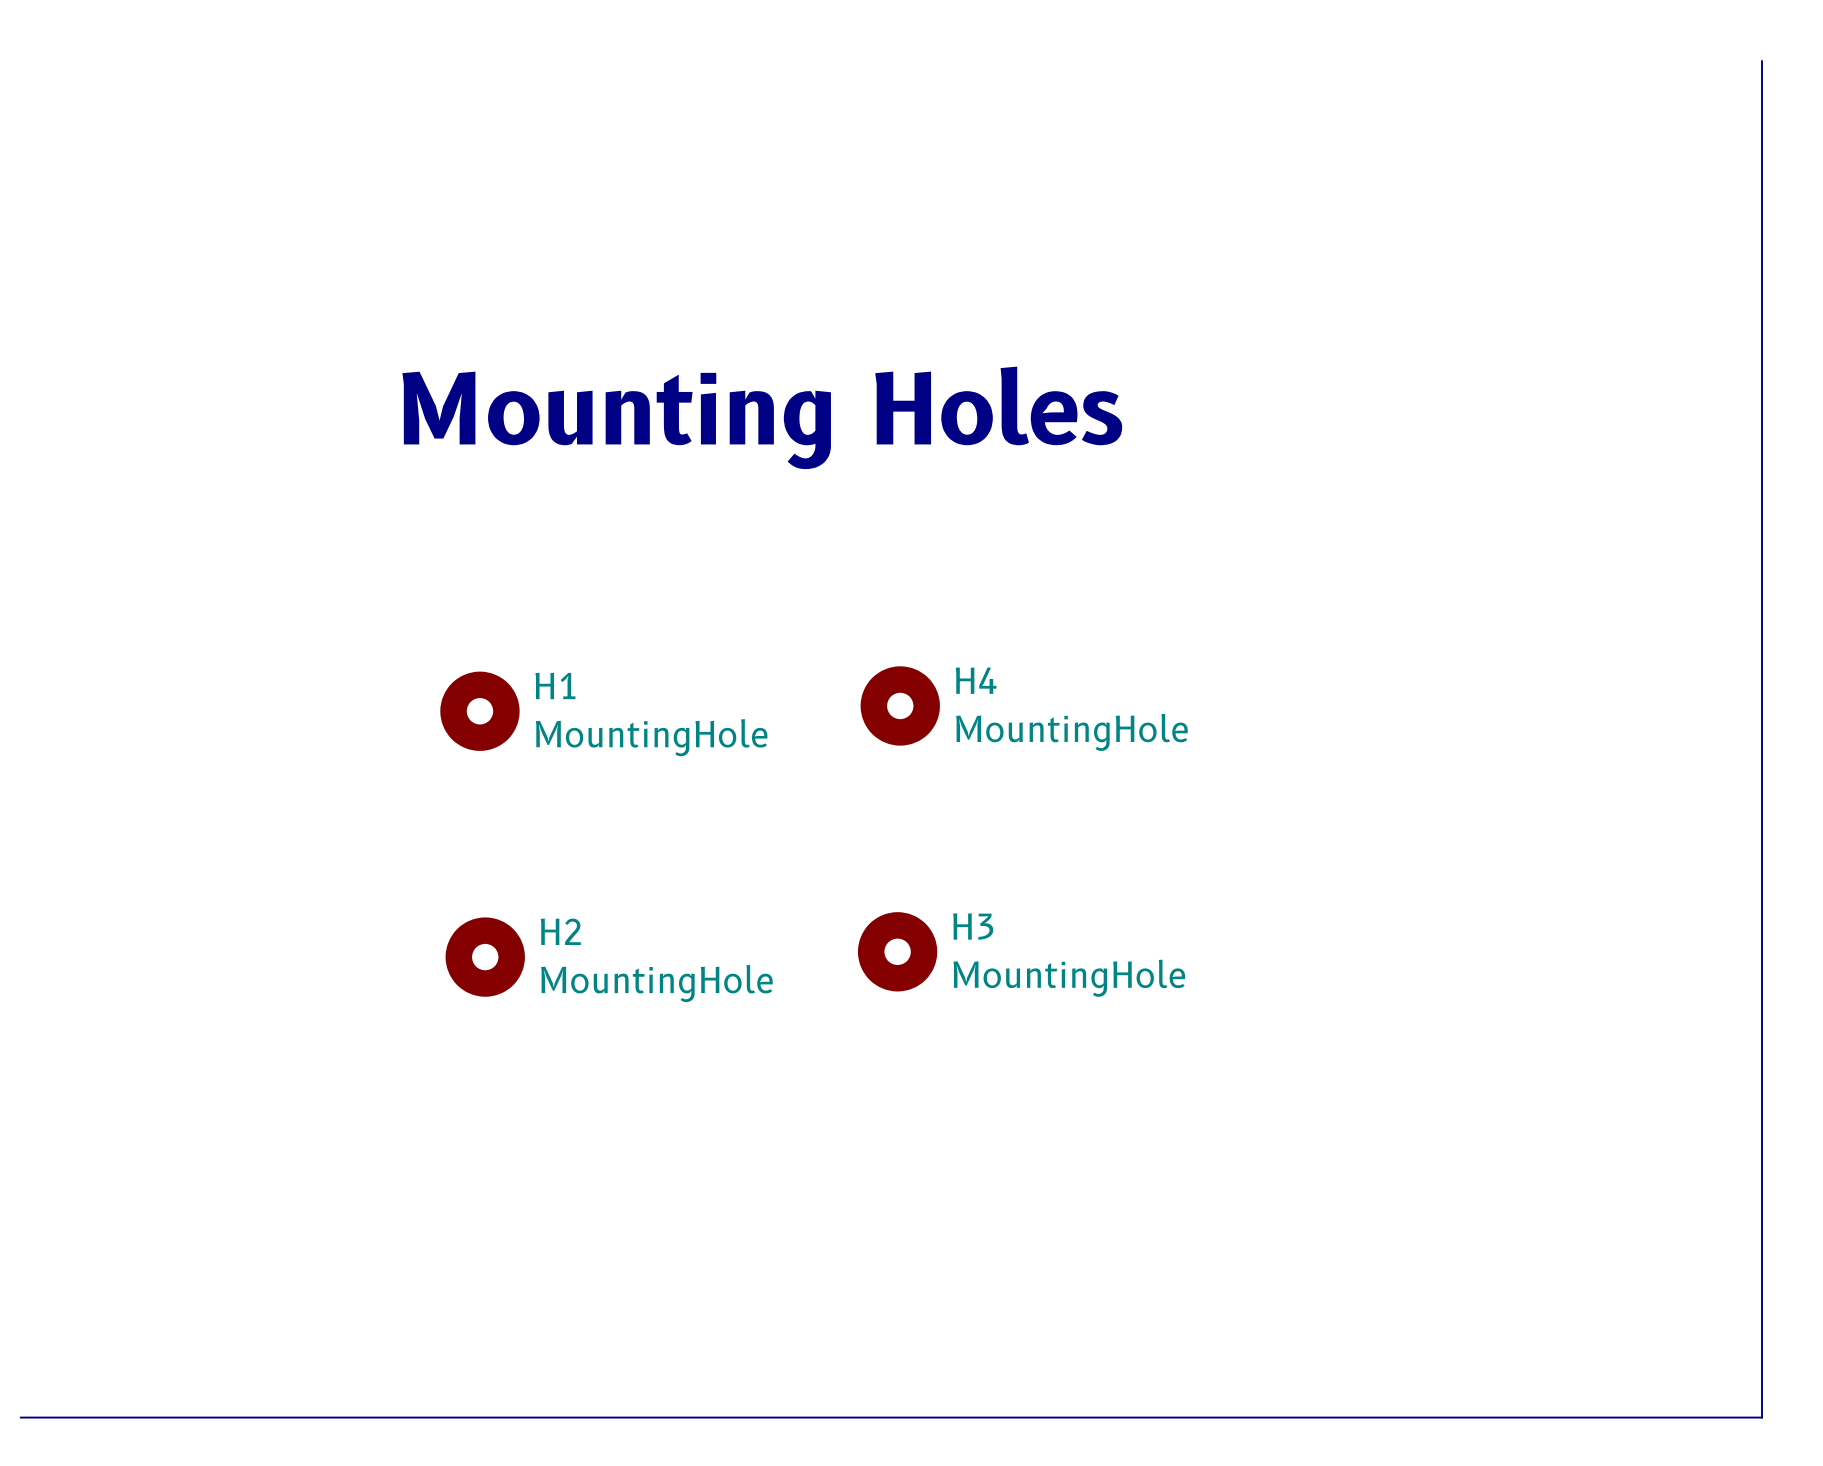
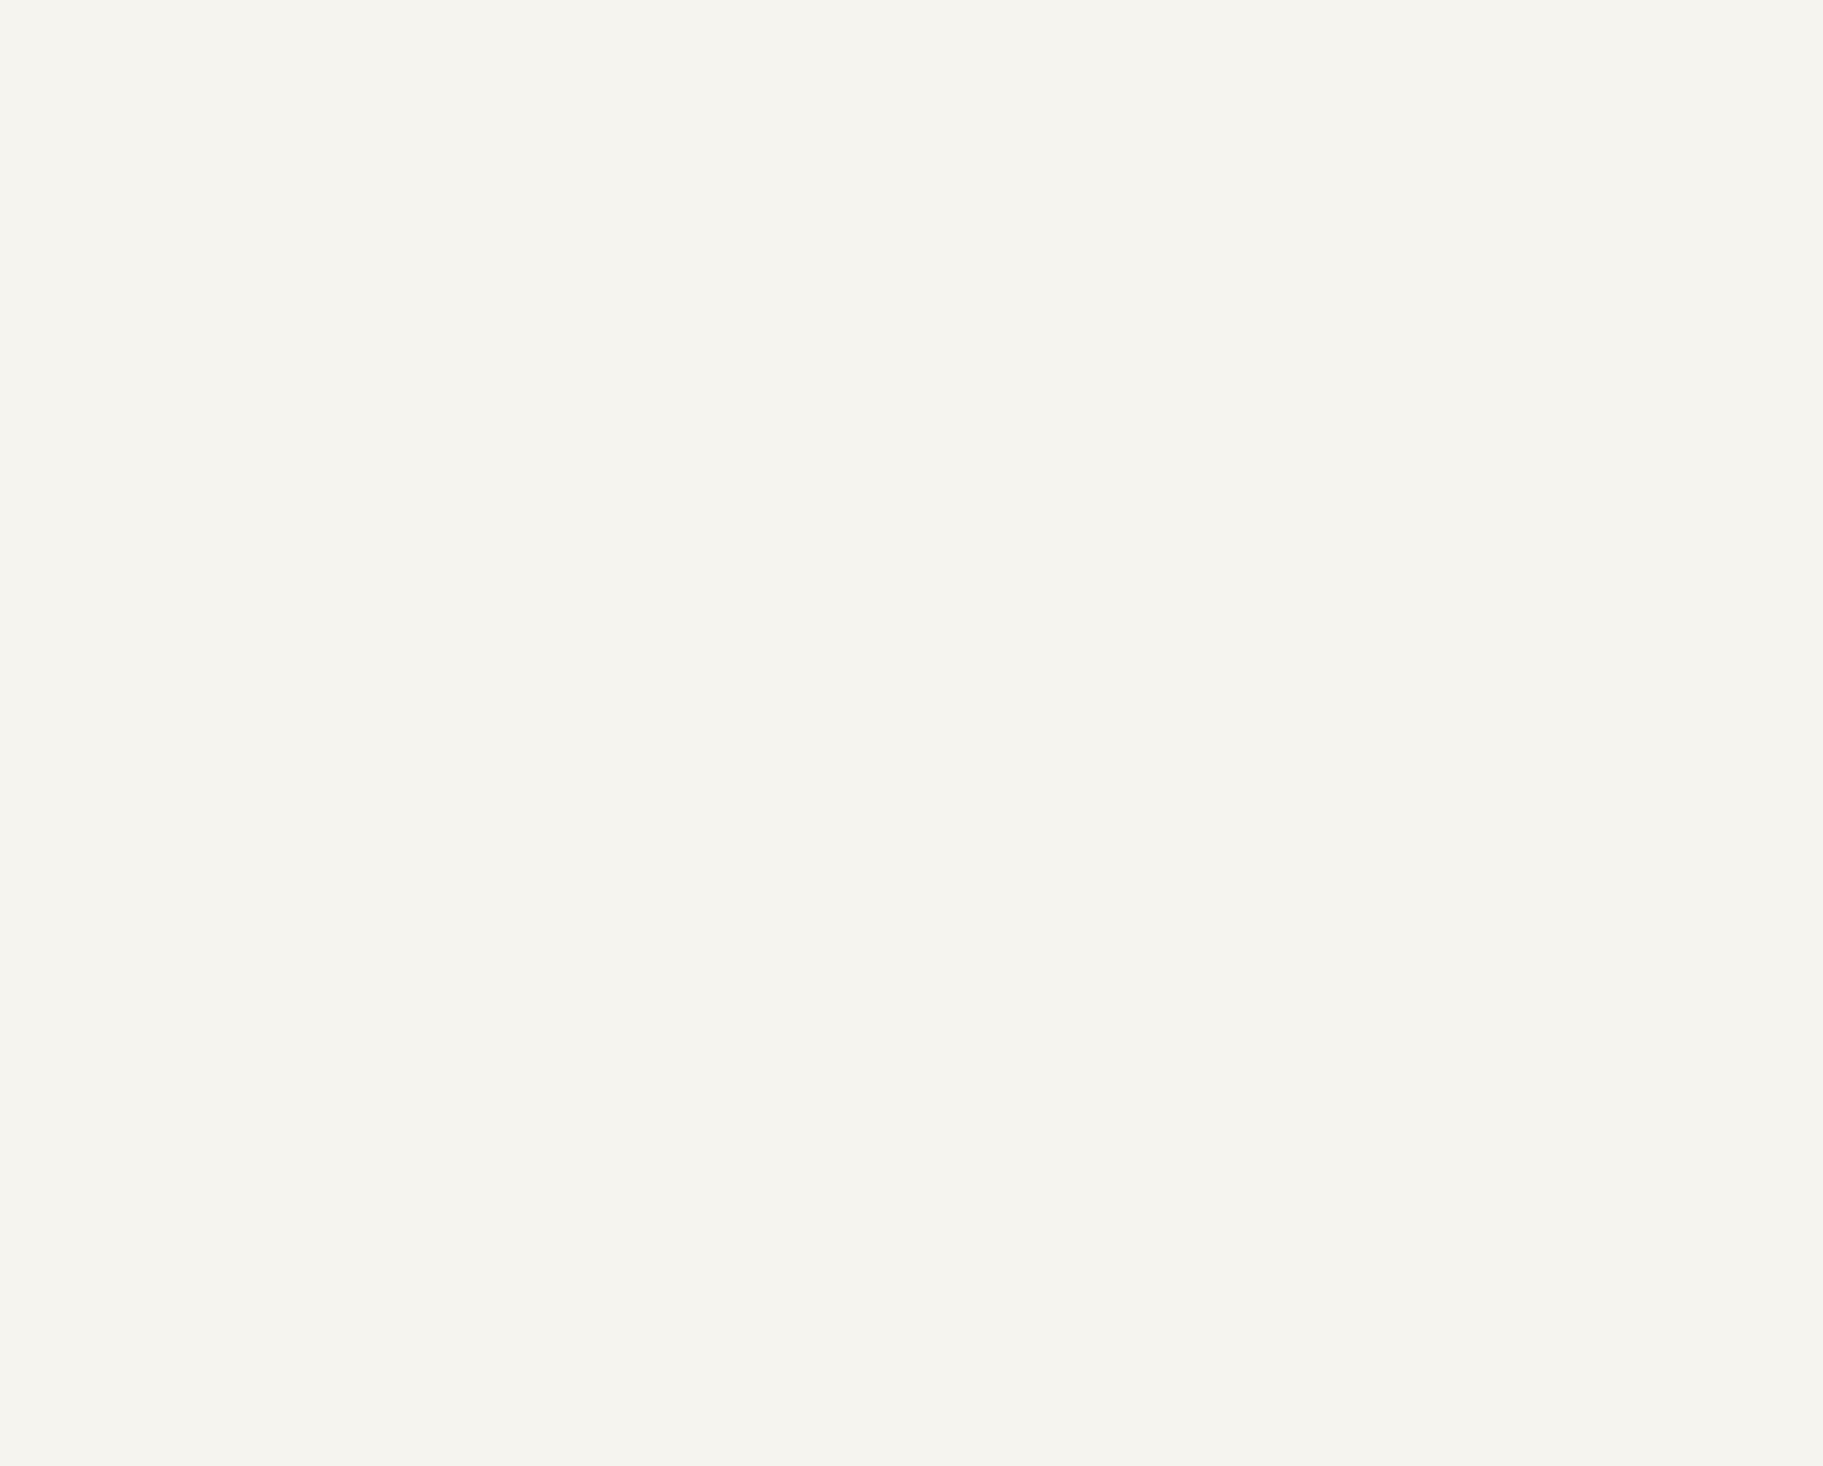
line: (1762, 60) (1762, 1417) (20, 1417) -> none
text: Mounting Holes (762, 417) -> none
H4: MountingHole (900, 705) -> none
H1: MountingHole (479, 711) -> none
H3: MountingHole (897, 951) -> none
H2: MountingHole (485, 957) -> none

